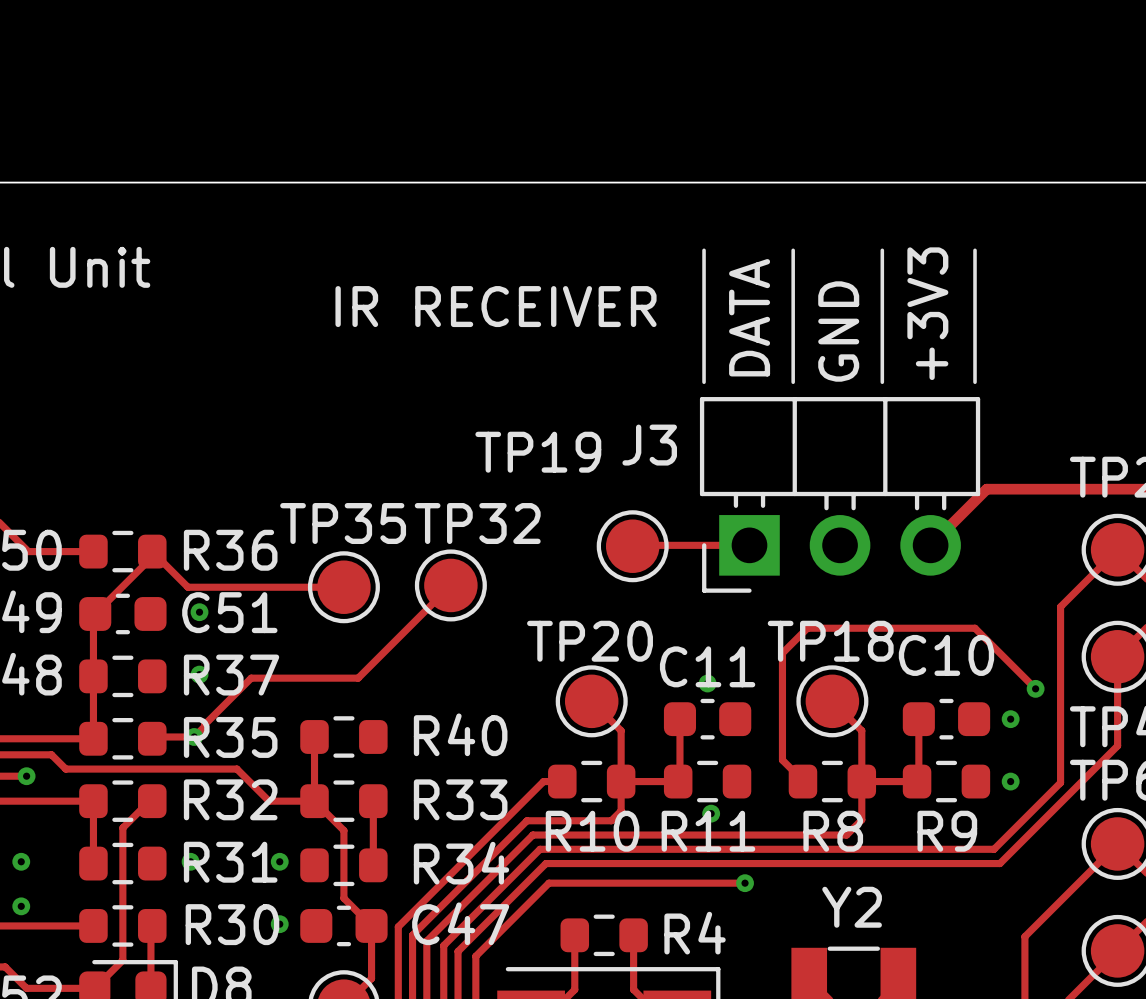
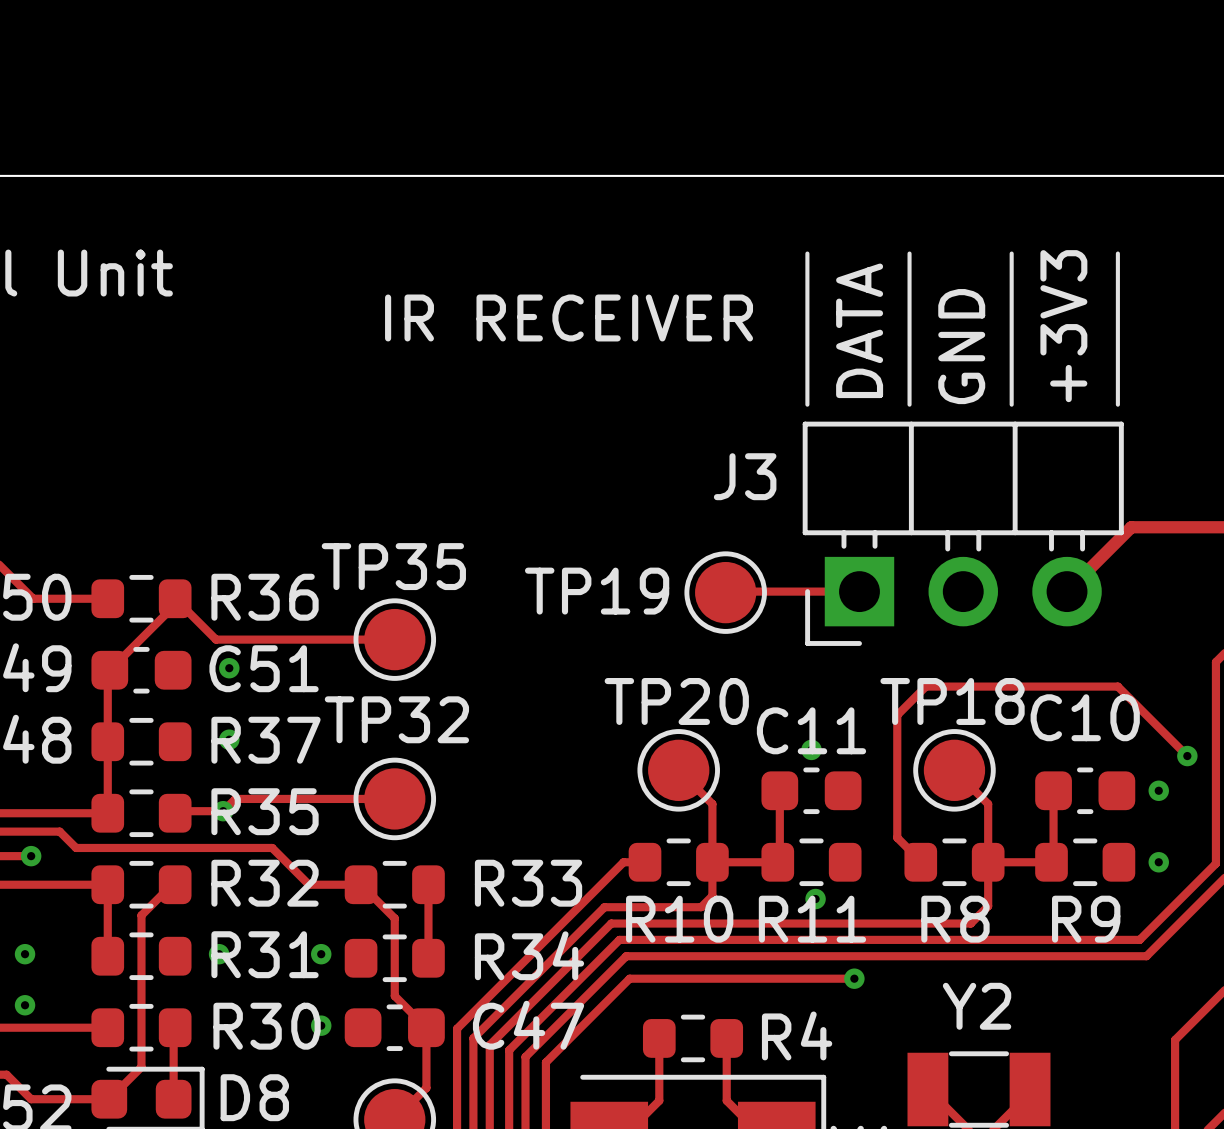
TP19 name position: TP19 (538, 452) -> TP19 (597, 591)
TP32 name position: TP32 (477, 523) -> TP32 (396, 719)
track: (450, 585) (358, 678) (251, 678) (204, 726) -> (394, 798) (235, 798)
TP32 position: (450, 585) -> (394, 798)
track: (314, 736) (314, 801) -> none
R40: (343, 736) -> none

